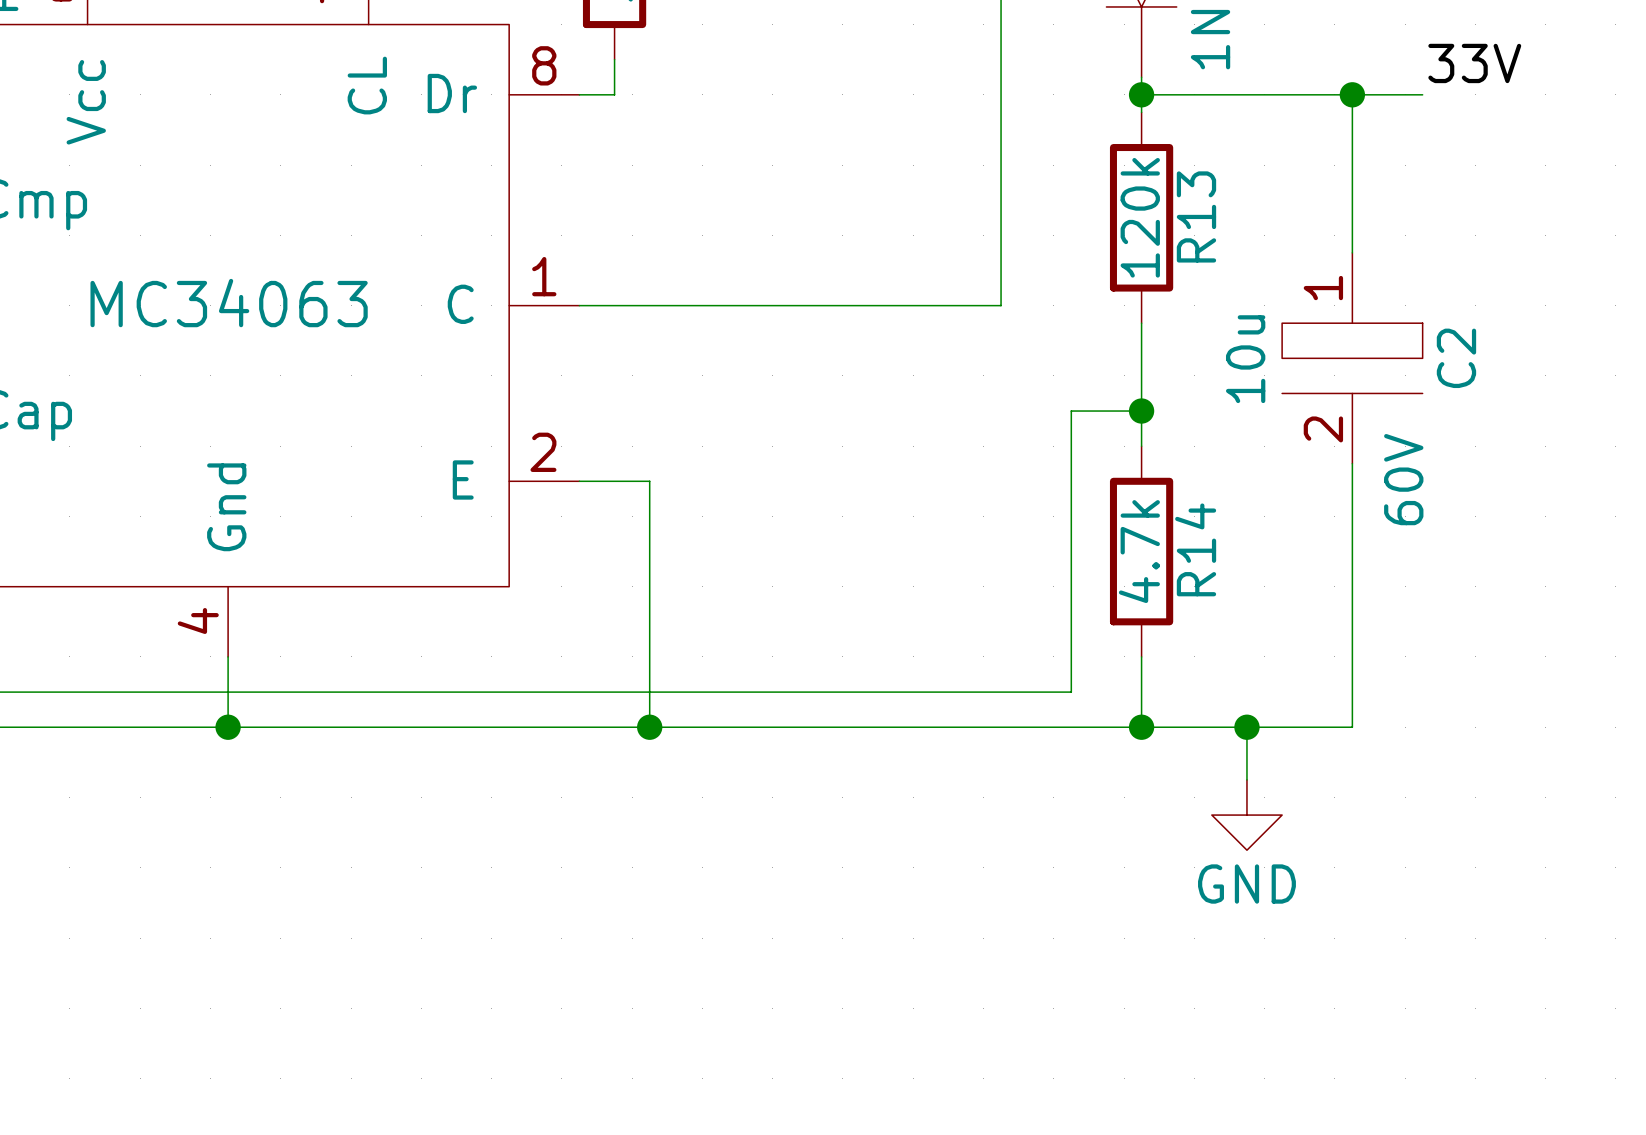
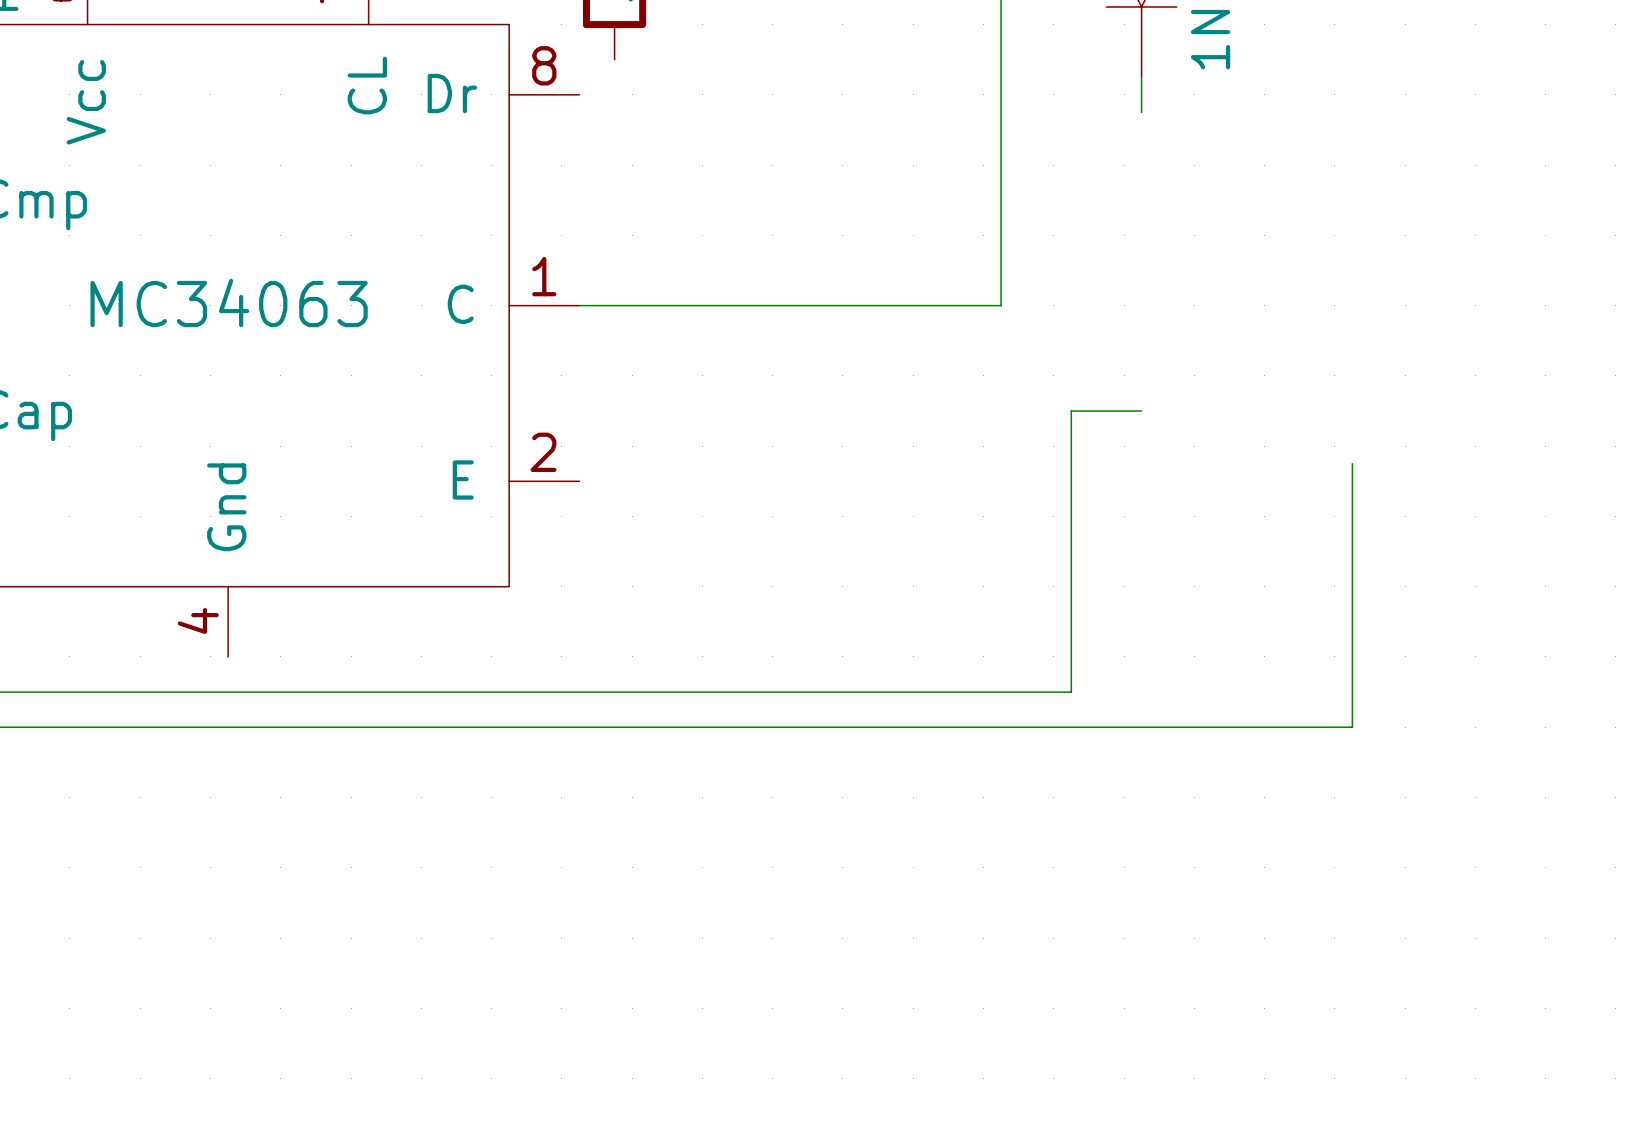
wire: (614, 59) (614, 94) (579, 94) -> none
label: 33V (1474, 63) -> none
wire: (1141, 94) (1422, 94) -> none
junction: (1141, 94) -> none
wire: (1352, 94) (1352, 252) -> none
junction: (1352, 94) -> none
R13: 120k (1141, 217) -> none
wire: (1141, 323) (1141, 446) -> none
C2: 10u (1352, 358) -> none
junction: (1141, 411) -> none
wire: (579, 481) (649, 481) (649, 727) -> none
R14: 4.7k (1141, 551) -> none
wire: (228, 656) (228, 727) -> none
wire: (1141, 656) (1141, 727) -> none
junction: (228, 727) -> none
junction: (649, 727) -> none
junction: (1141, 727) -> none
wire: (1246, 727) (1246, 779) -> none
junction: (1246, 727) -> none
power symbol: GND (1246, 815) -> none

